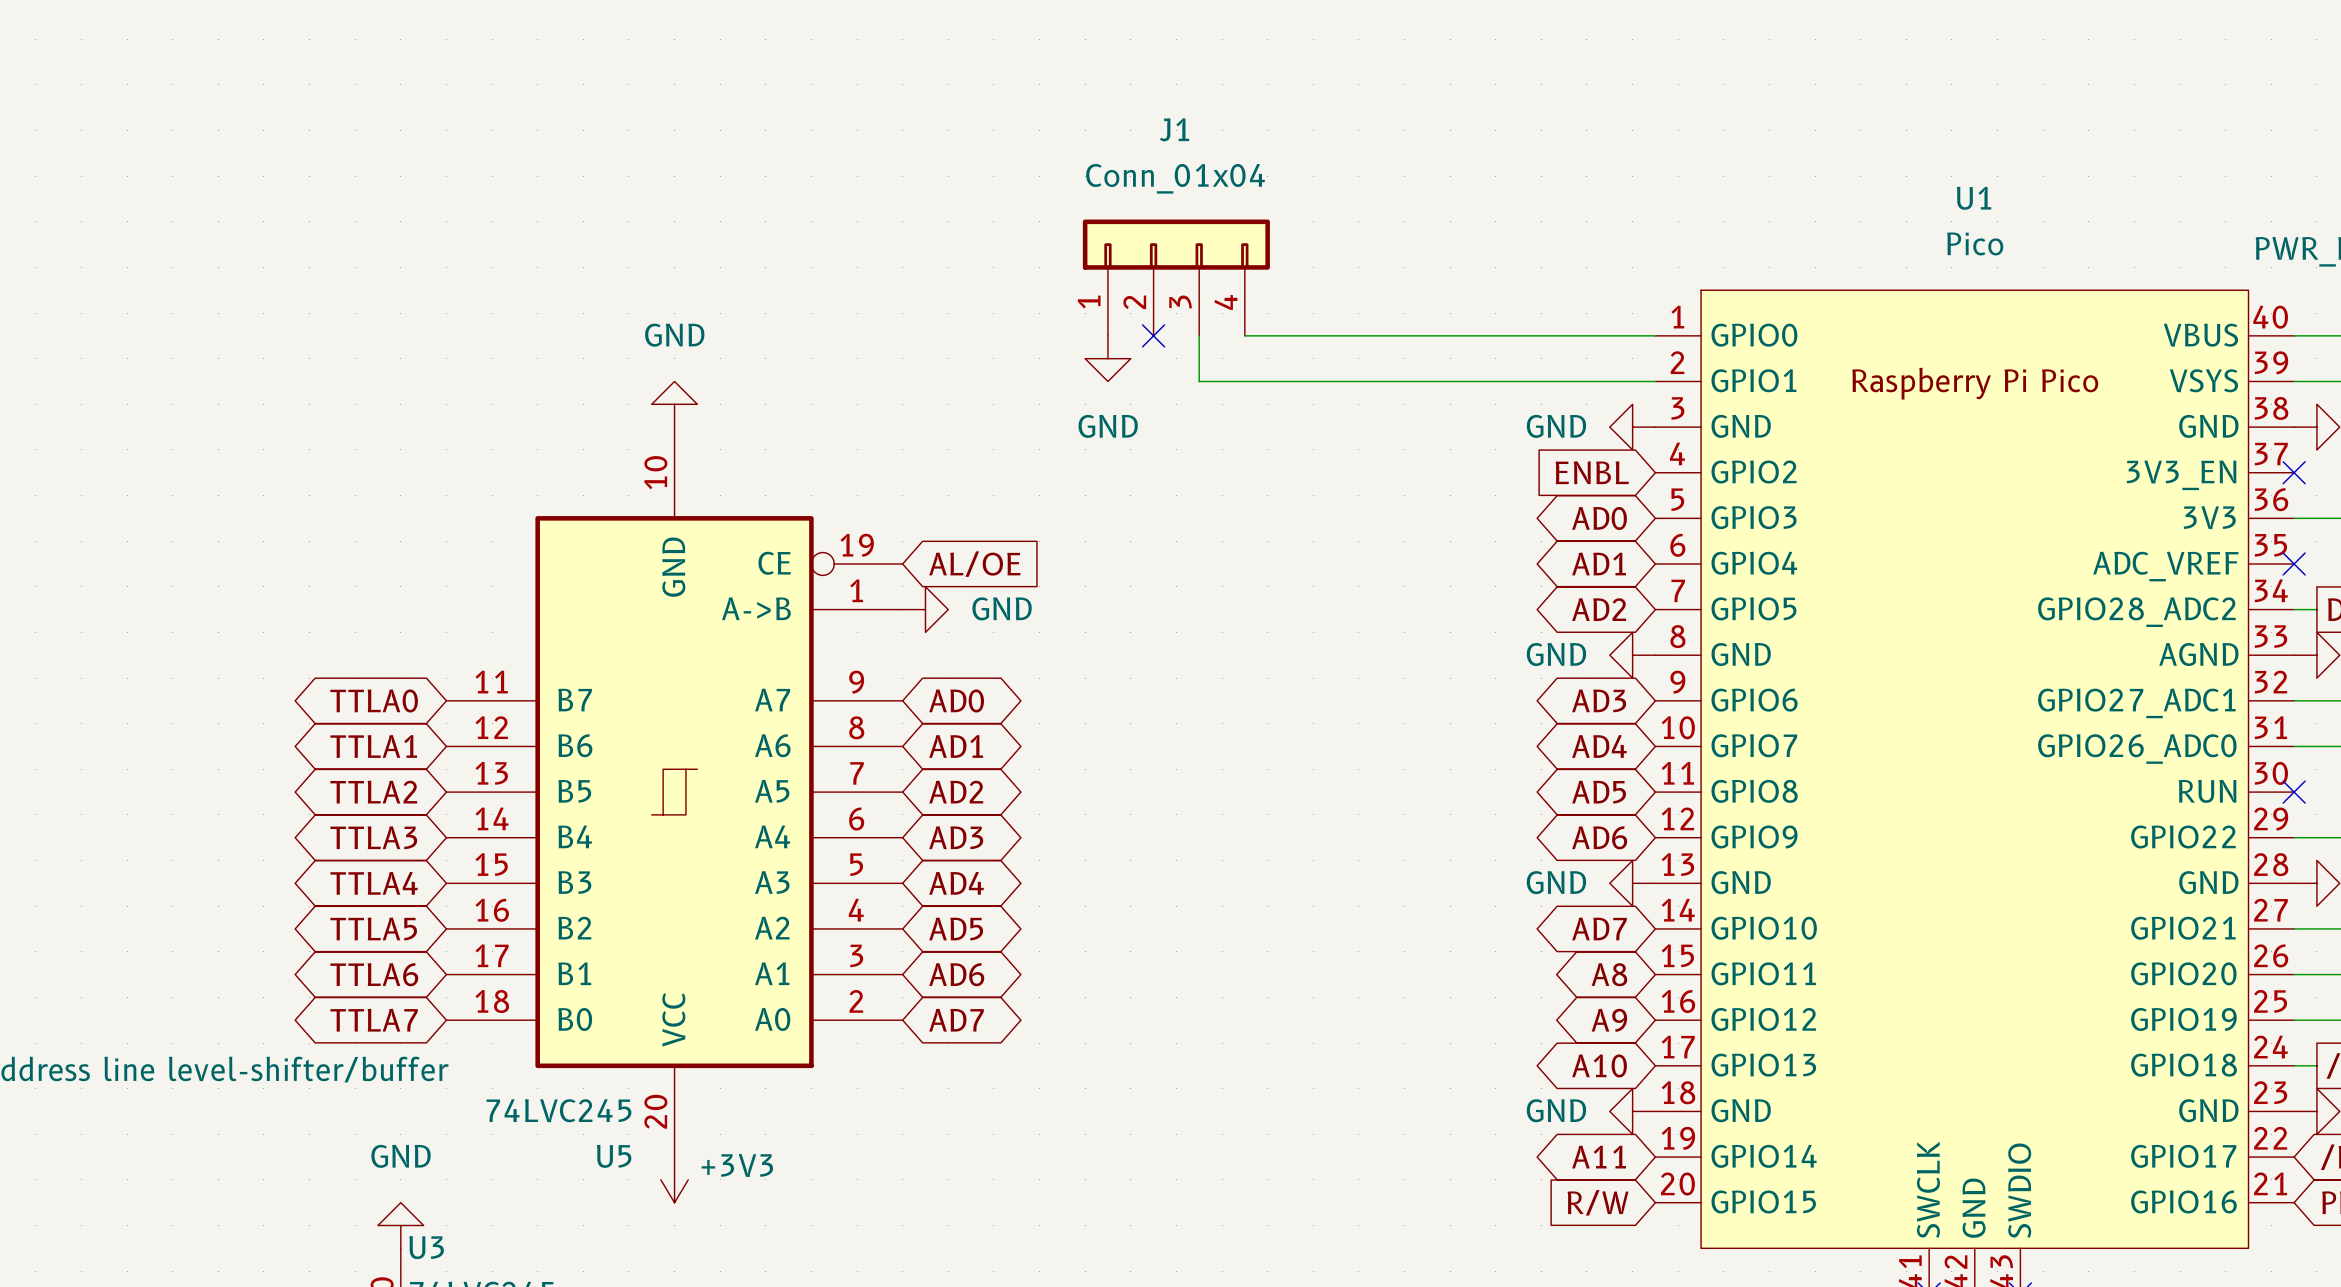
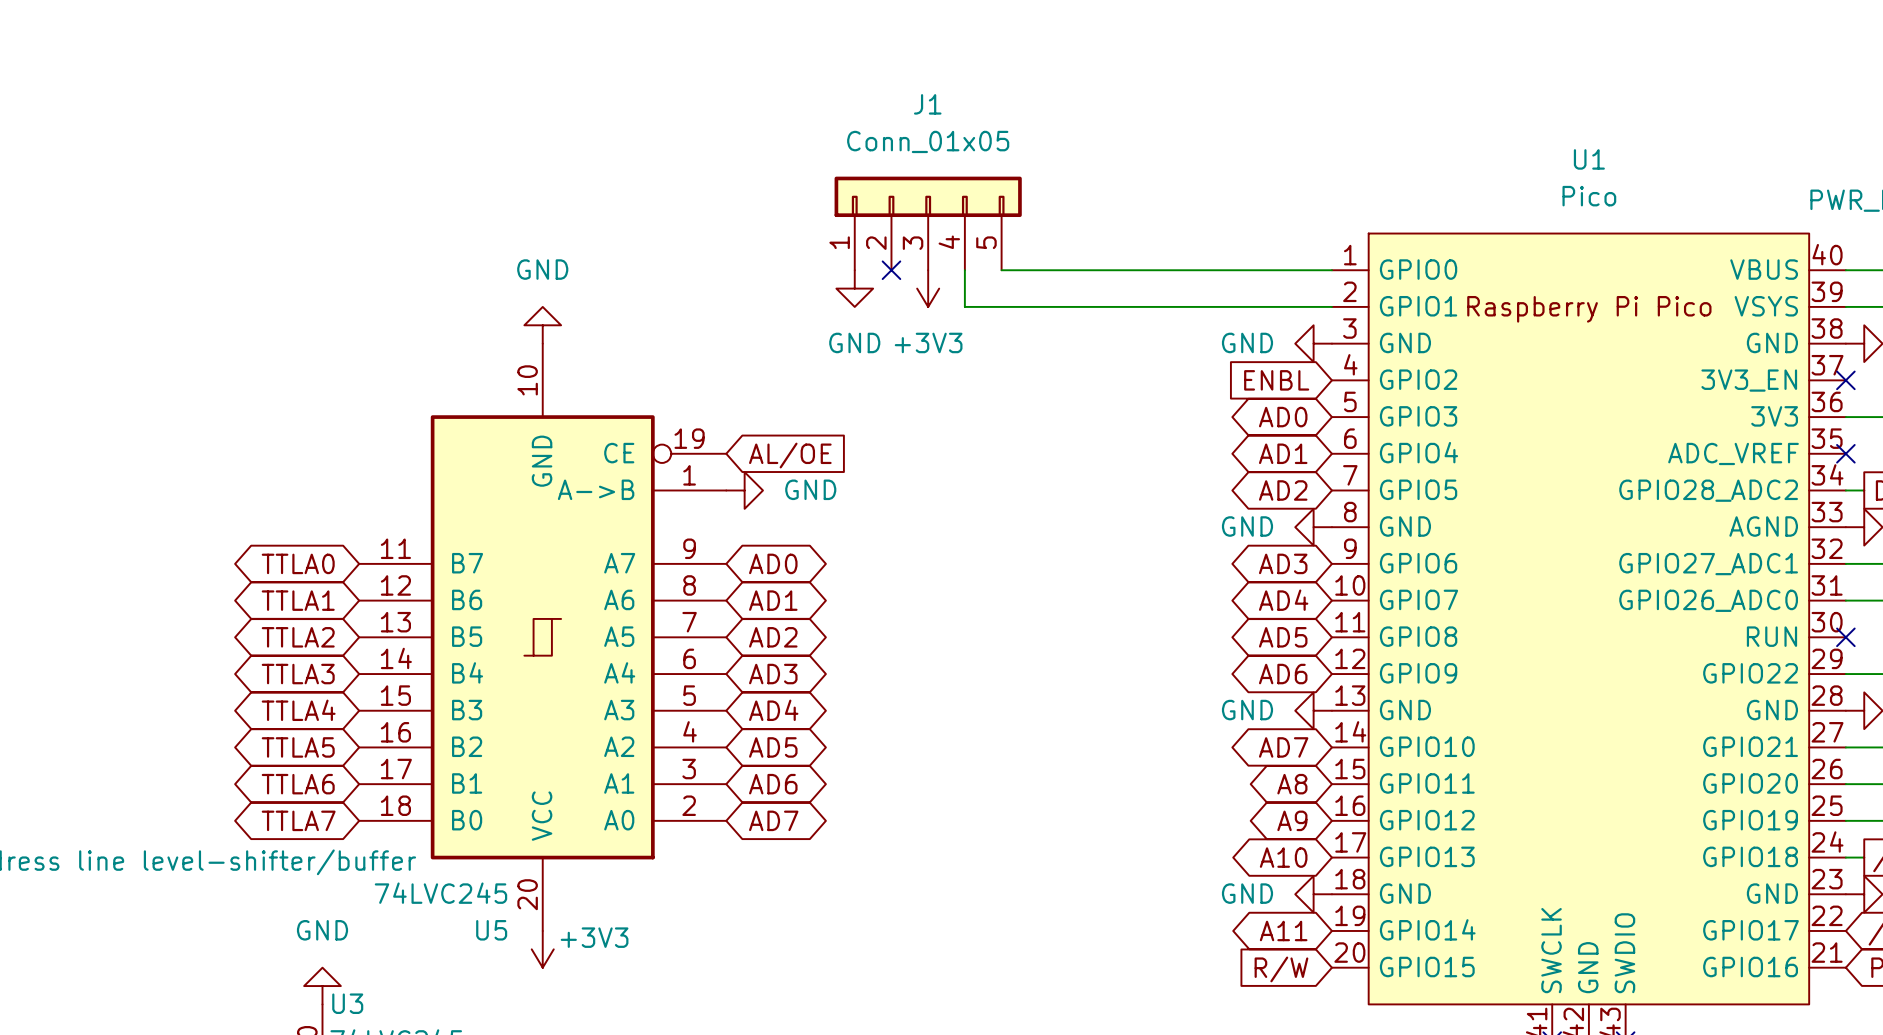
J1 value: Conn_01x04 (1175, 178) -> Conn_01x05 (928, 141)
J1 symbol: [1082, 219, 1270, 336] -> [834, 176, 1022, 271]
no-connect mark position: (1153, 335) -> (891, 270)
power symbol position: GND (1107, 358) -> GND (854, 288)
power symbol: none -> +3V3 (928, 288)

